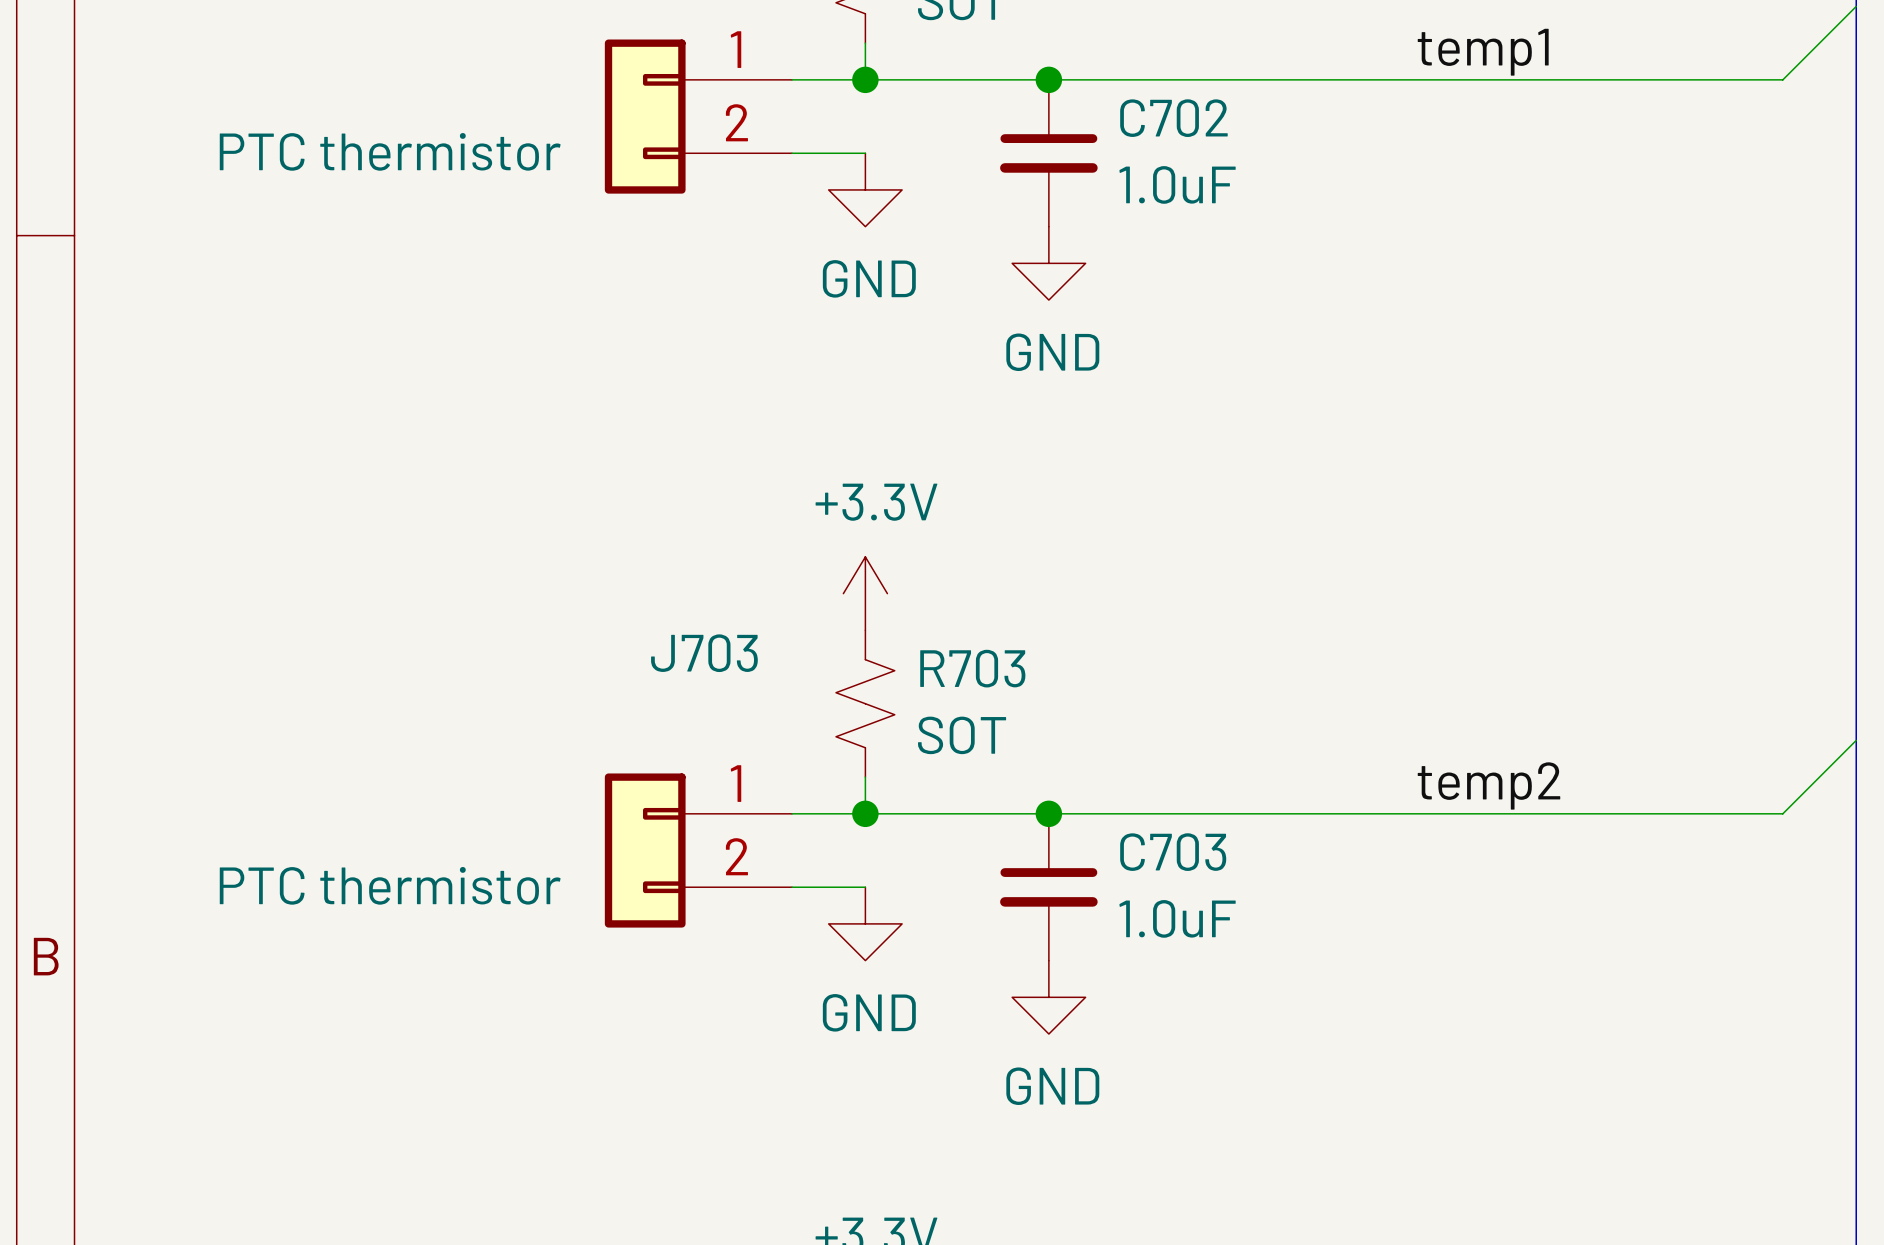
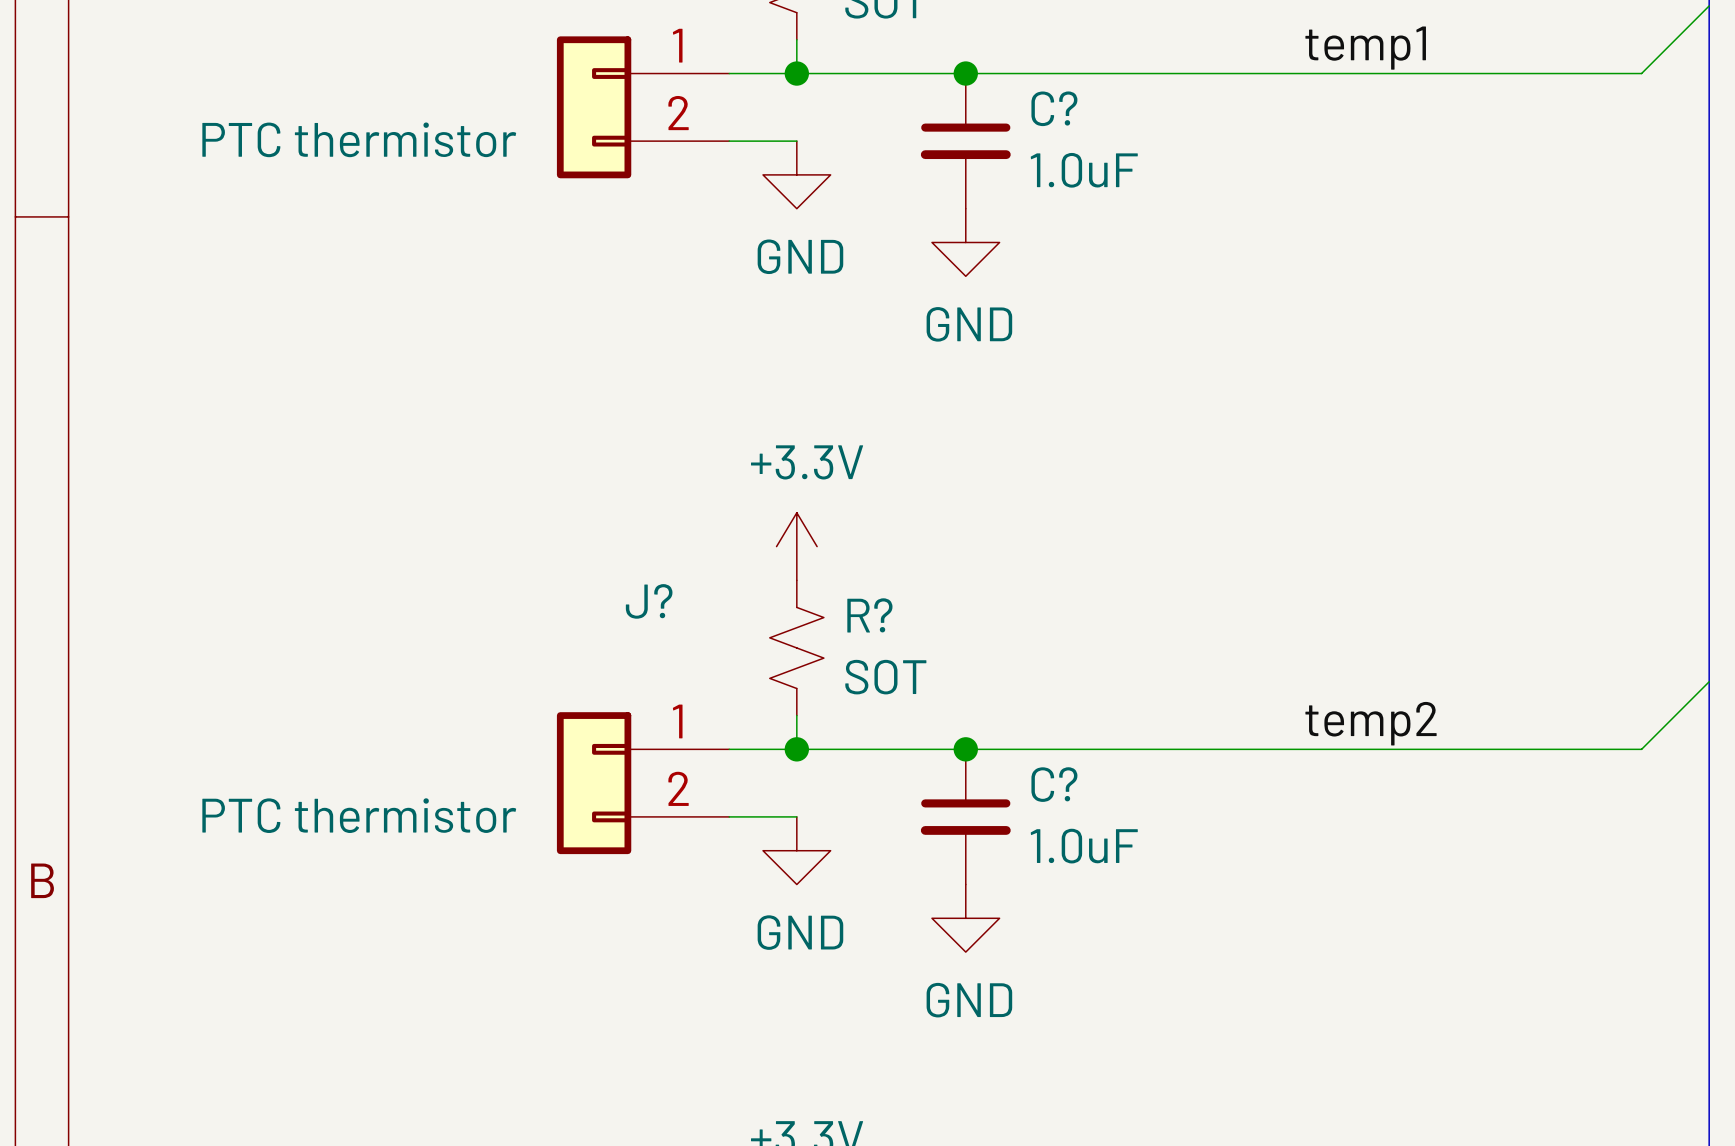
C702 name: C702 (1173, 118) -> C? (1054, 108)
J703 name: J703 (704, 653) -> J? (649, 601)
R703 name: R703 (972, 668) -> R? (869, 615)
C703 name: C703 (1173, 852) -> C? (1054, 784)

